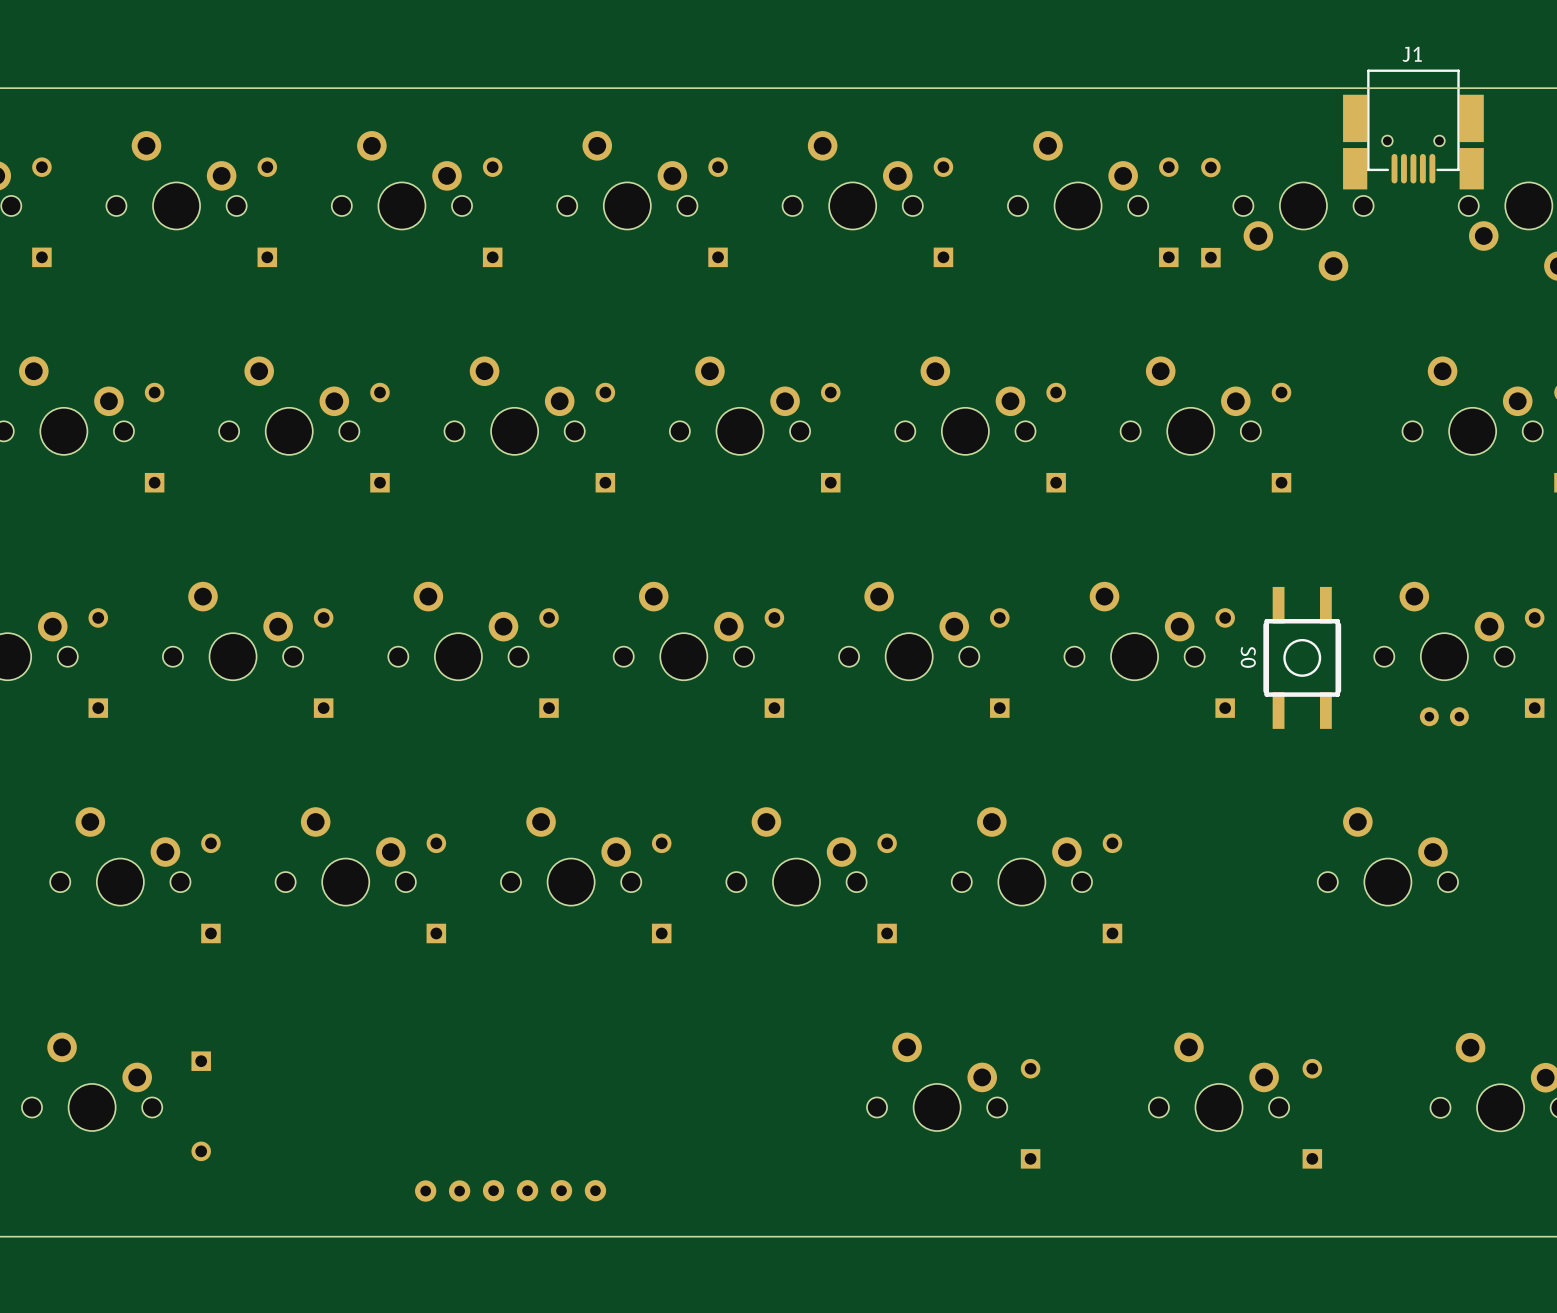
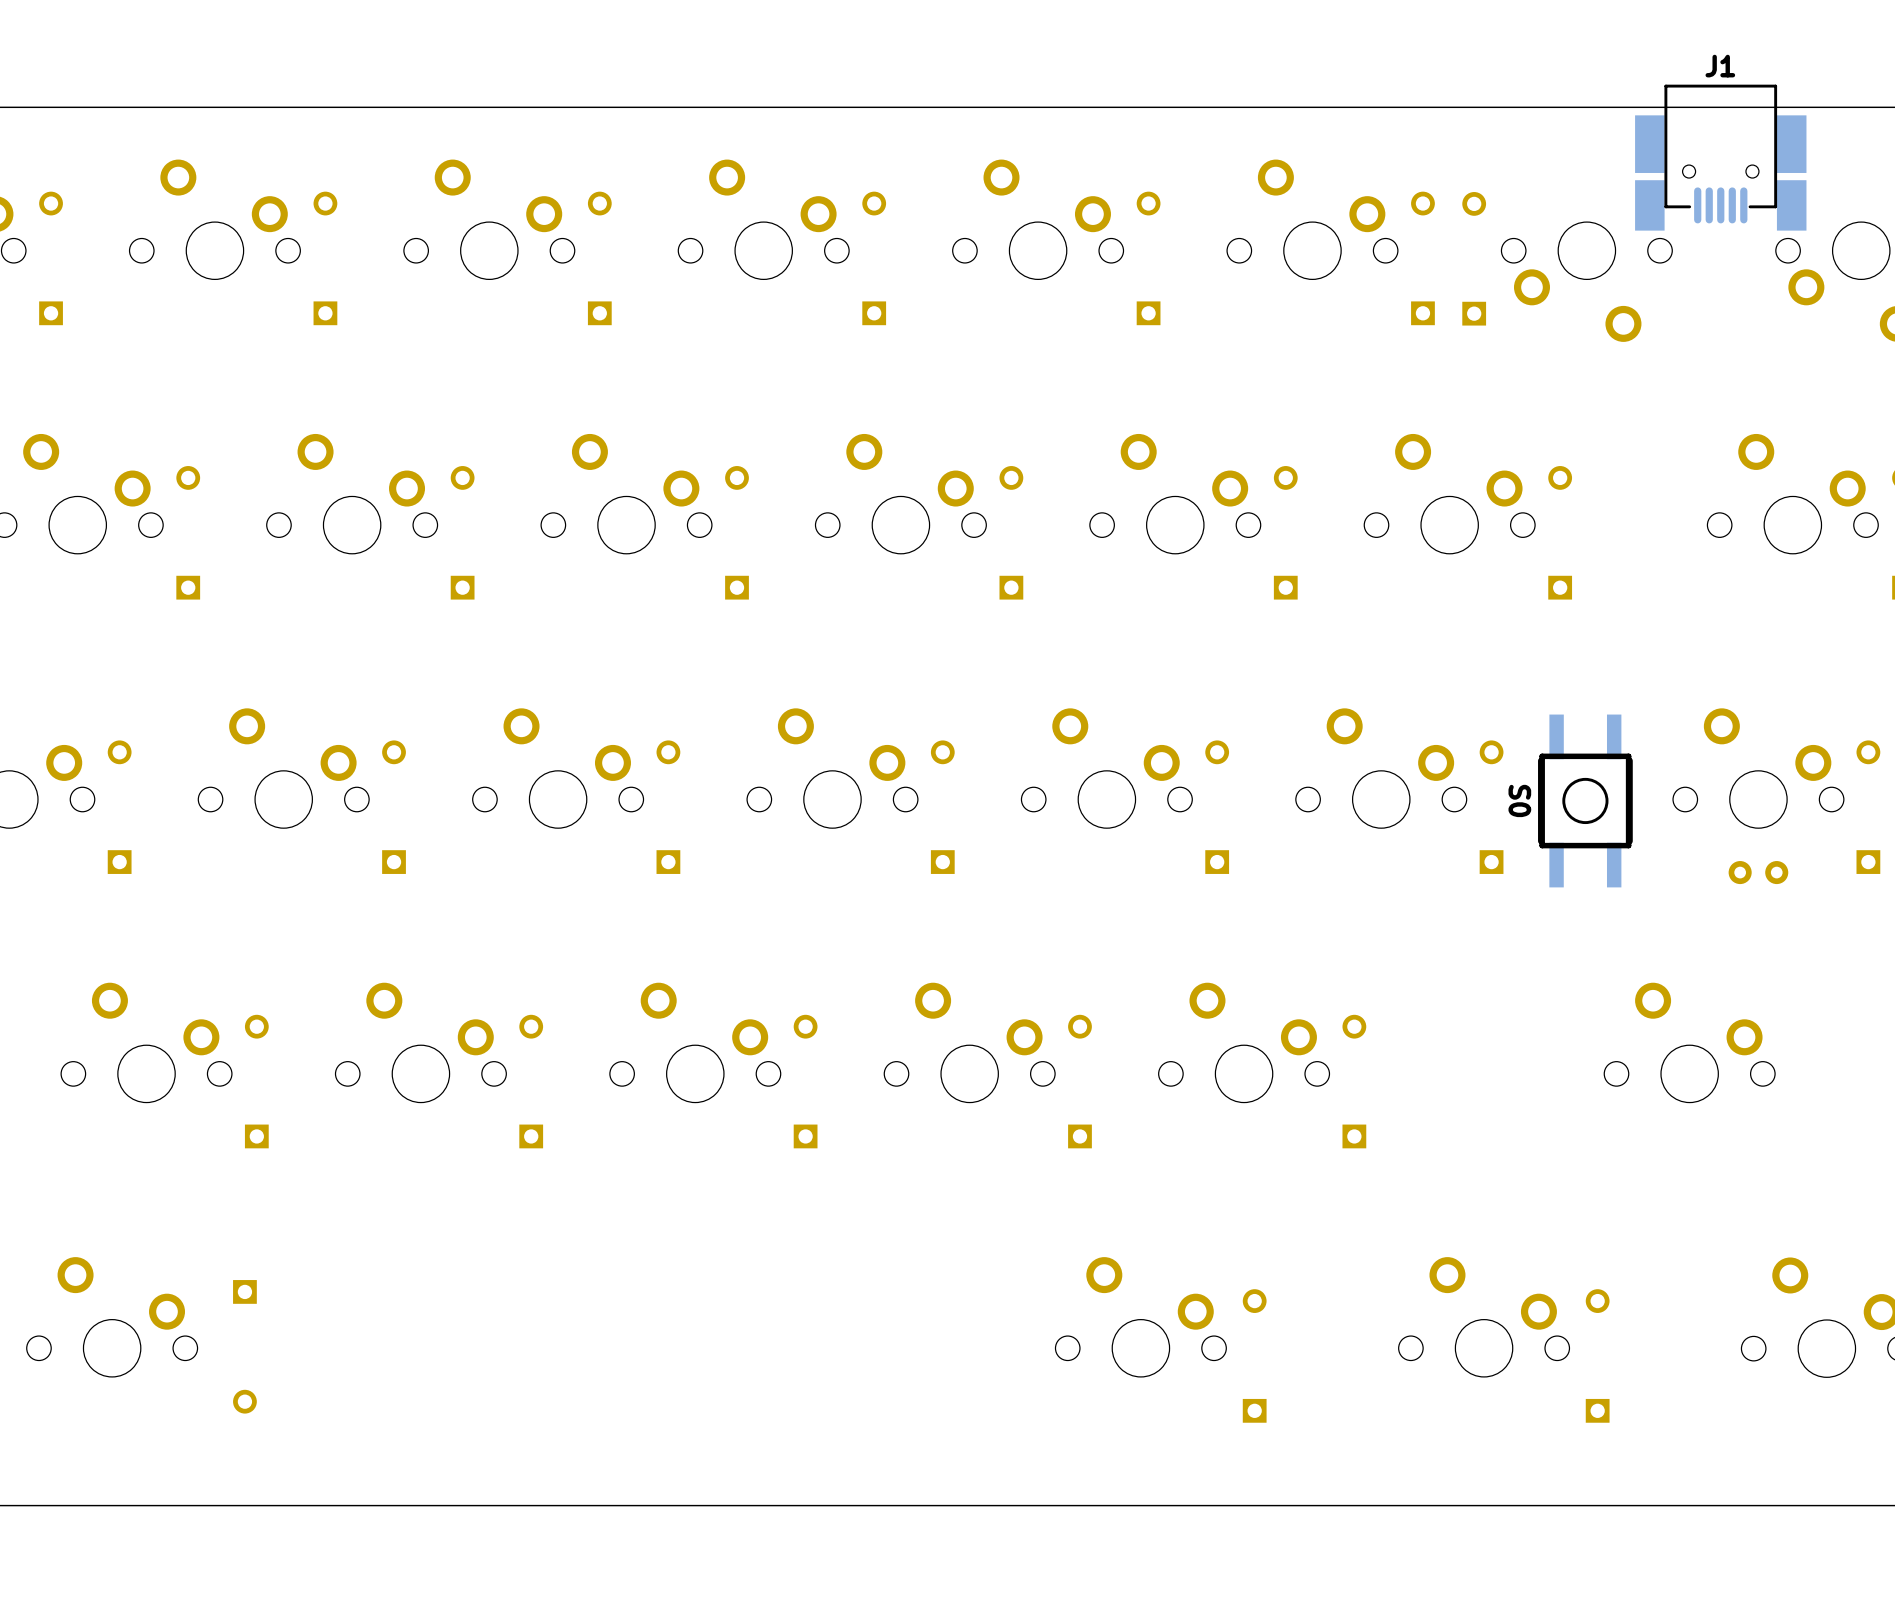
part: (493, 1190) -> none
part: (527, 1190) -> none
part: (561, 1190) -> none
part: (595, 1190) -> none
part: (425, 1191) -> none
part: (459, 1191) -> none

